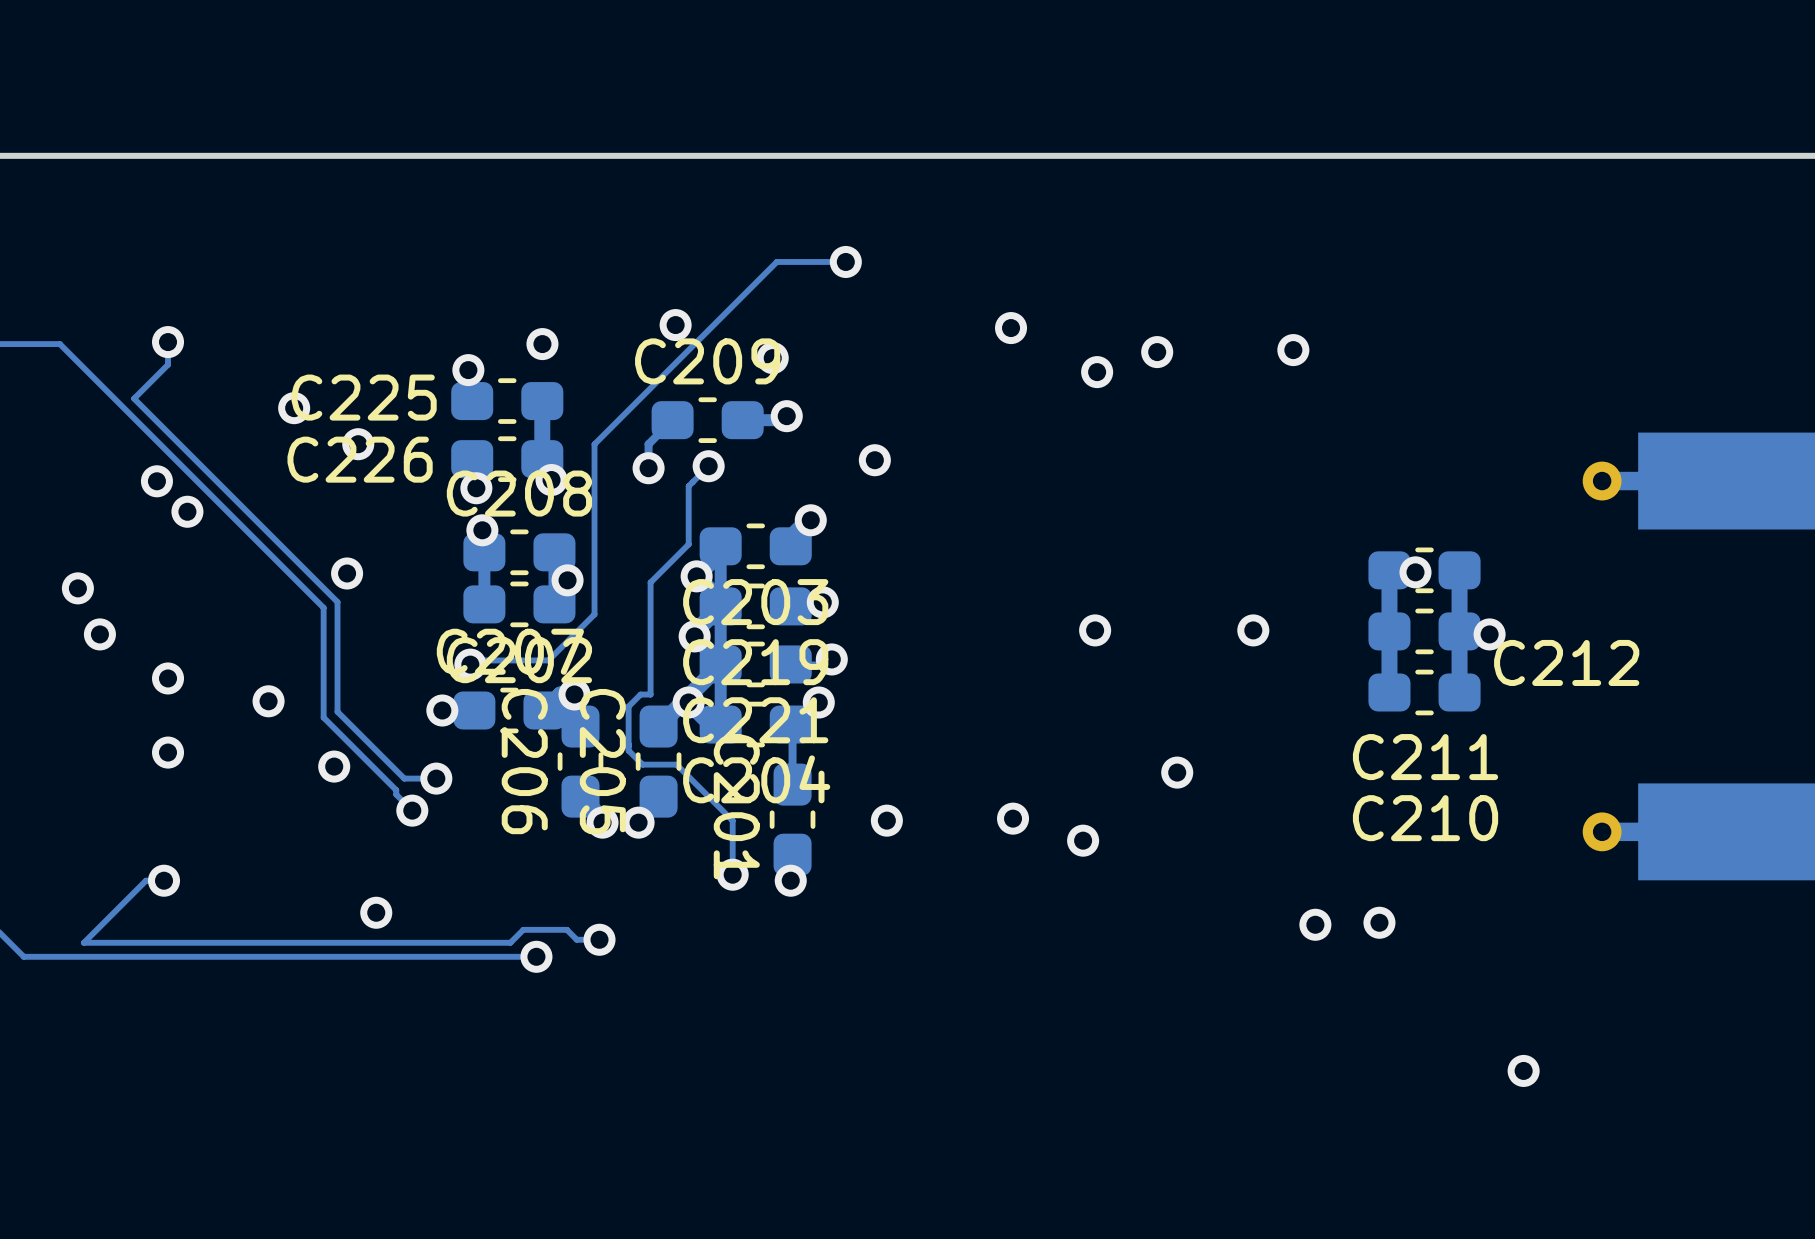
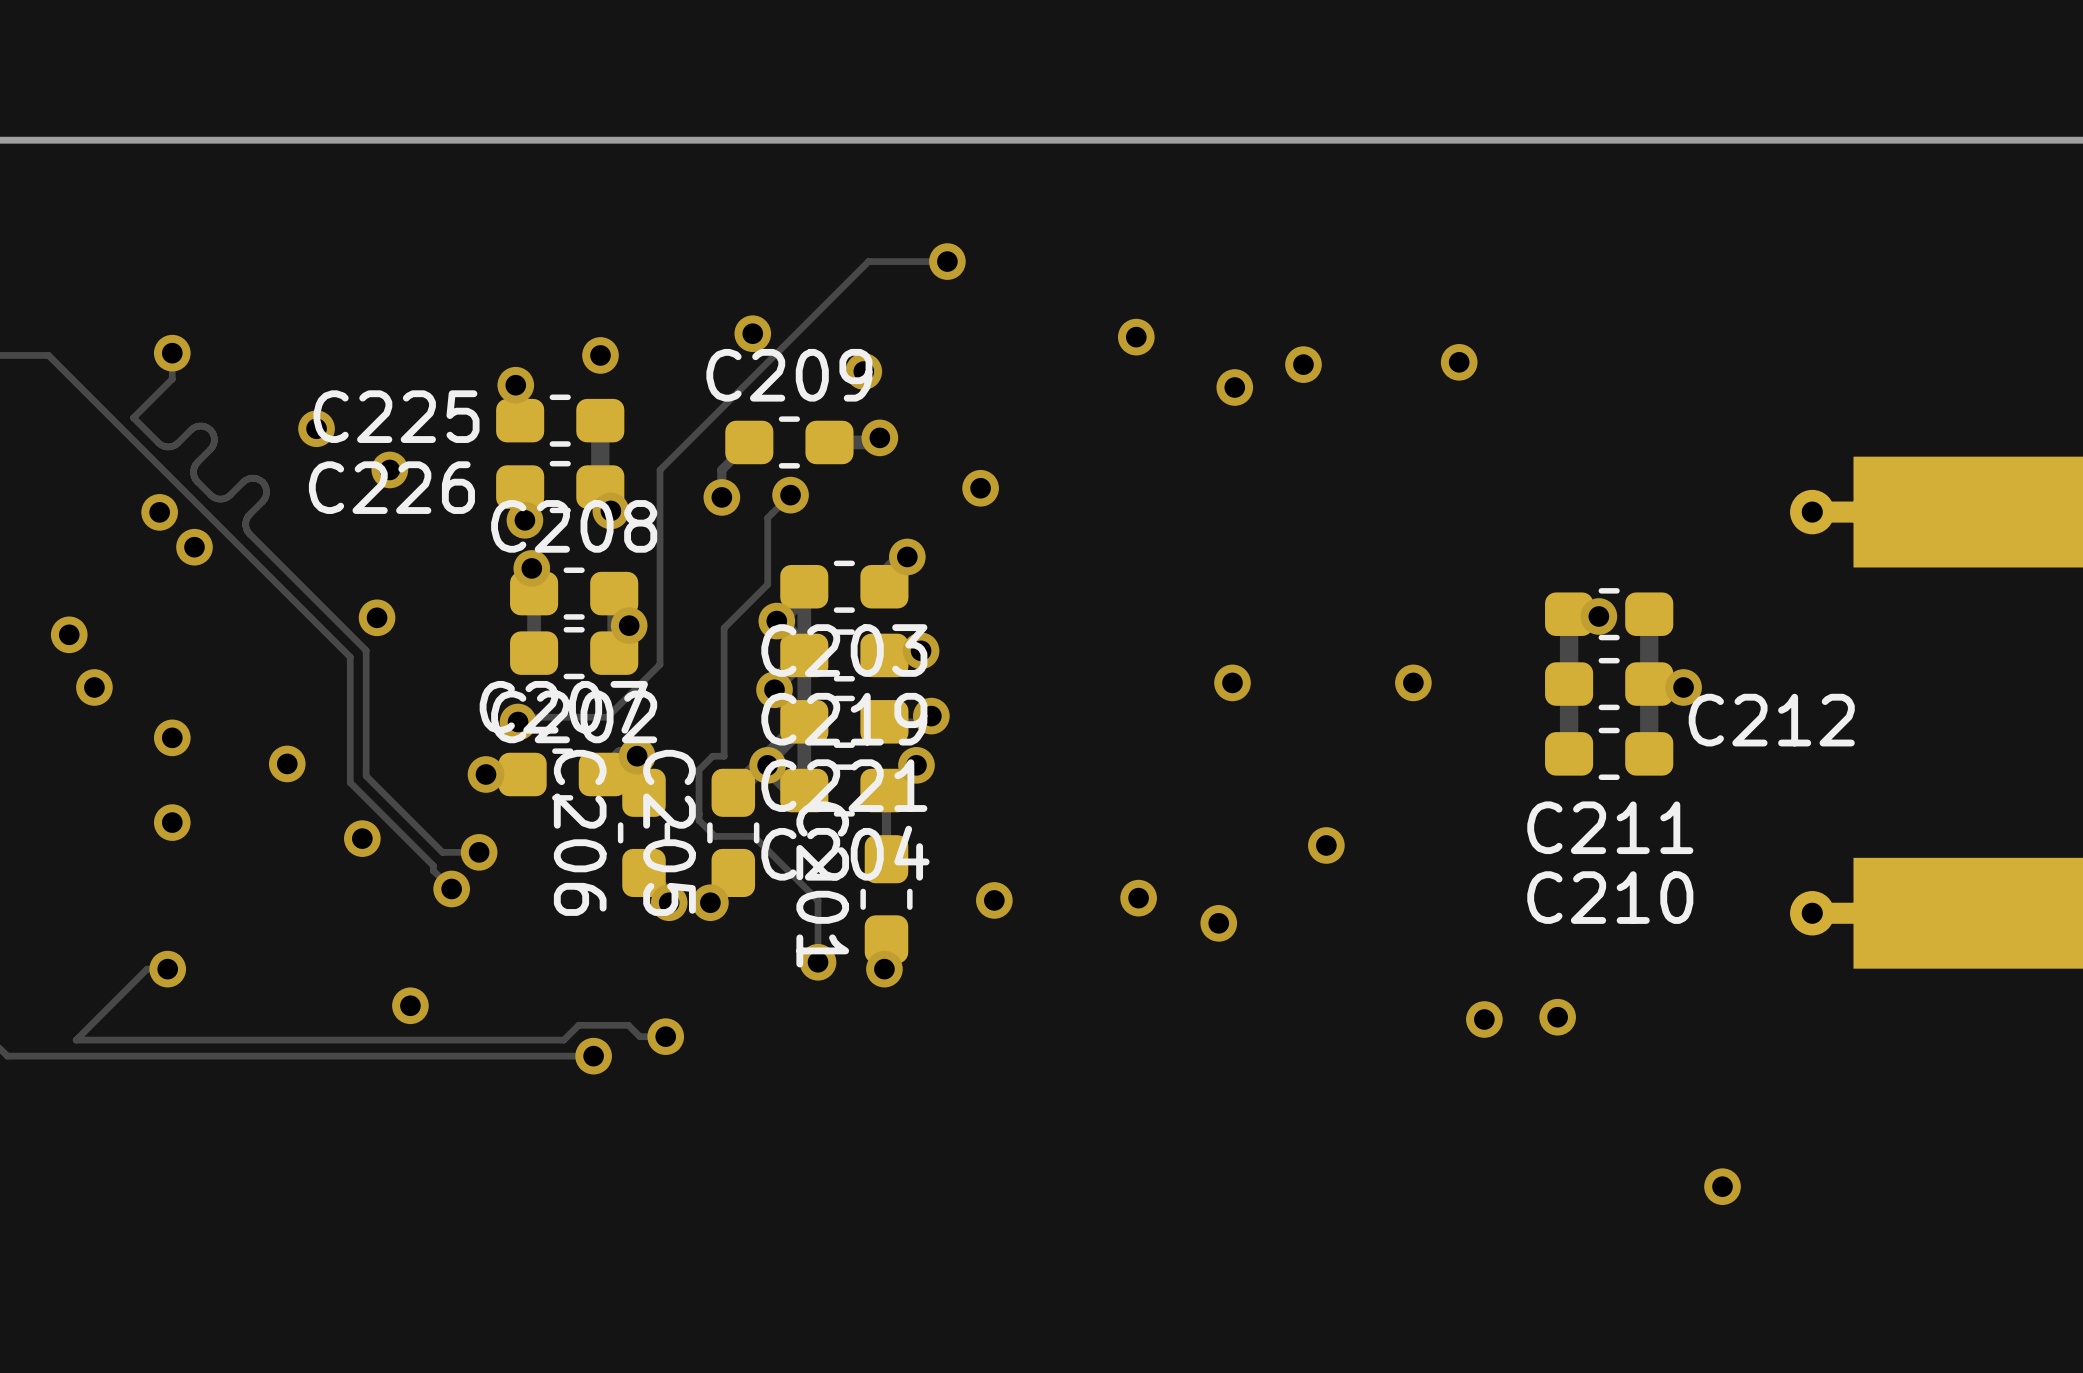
track: (156, 420) (190, 454) -> (158, 442) (166, 446) (172, 446) (196, 426) (202, 426) (210, 430) (213, 435) (213, 444) (194, 467) (193, 473) (197, 481)
track: (201, 466) (235, 500) -> (210, 495) (218, 499) (225, 498) (248, 478) (254, 478) (262, 482) (266, 490) (265, 496) (246, 519) (245, 525) (249, 533)

